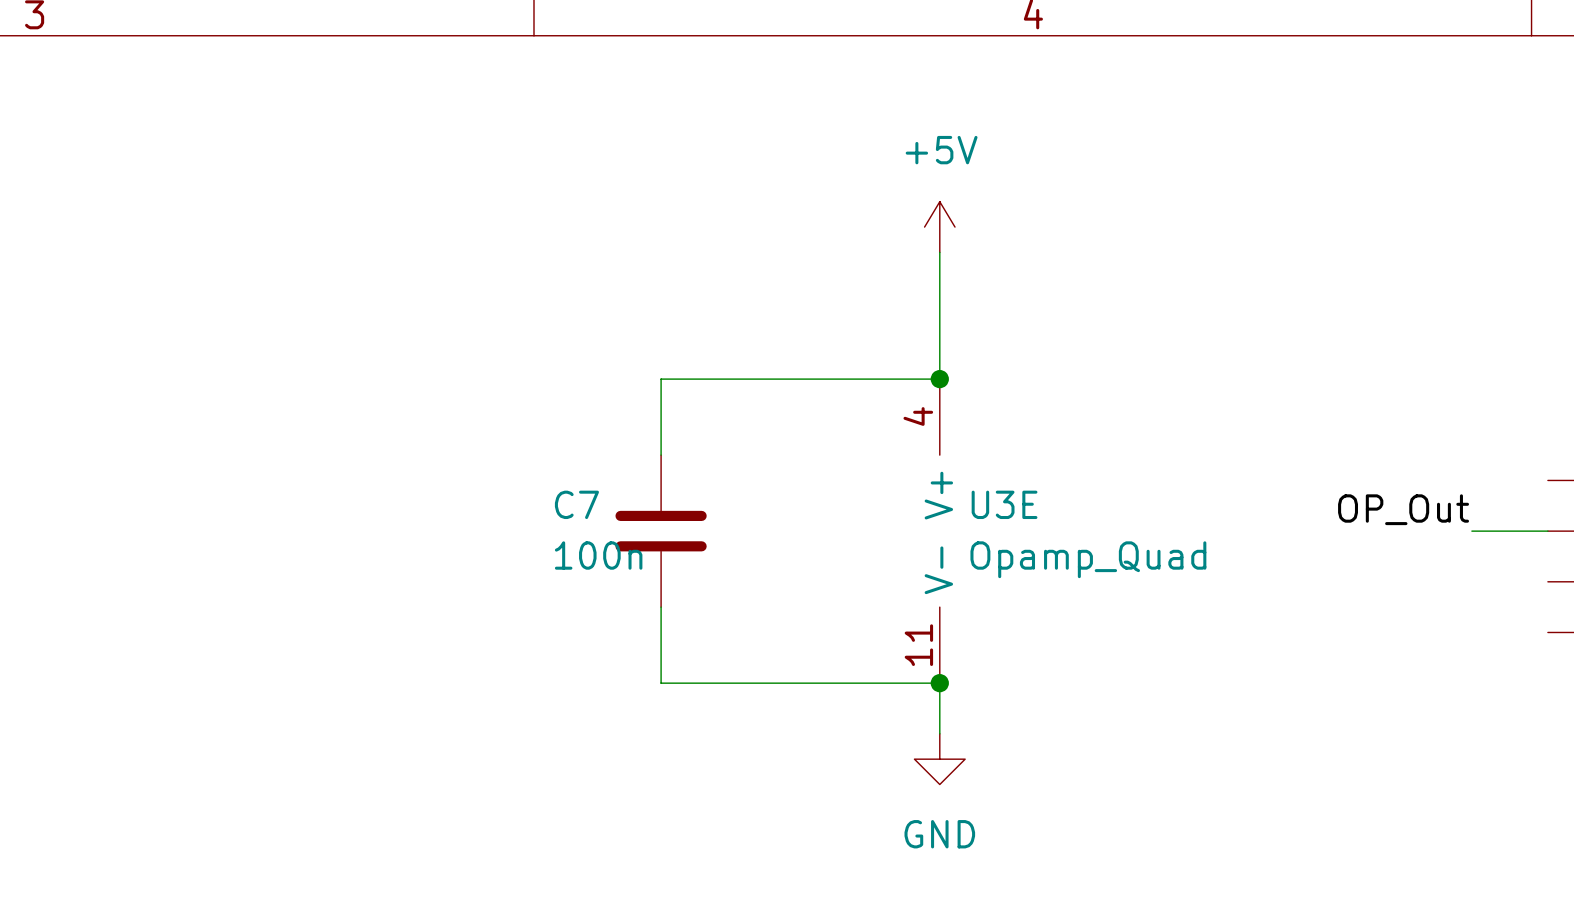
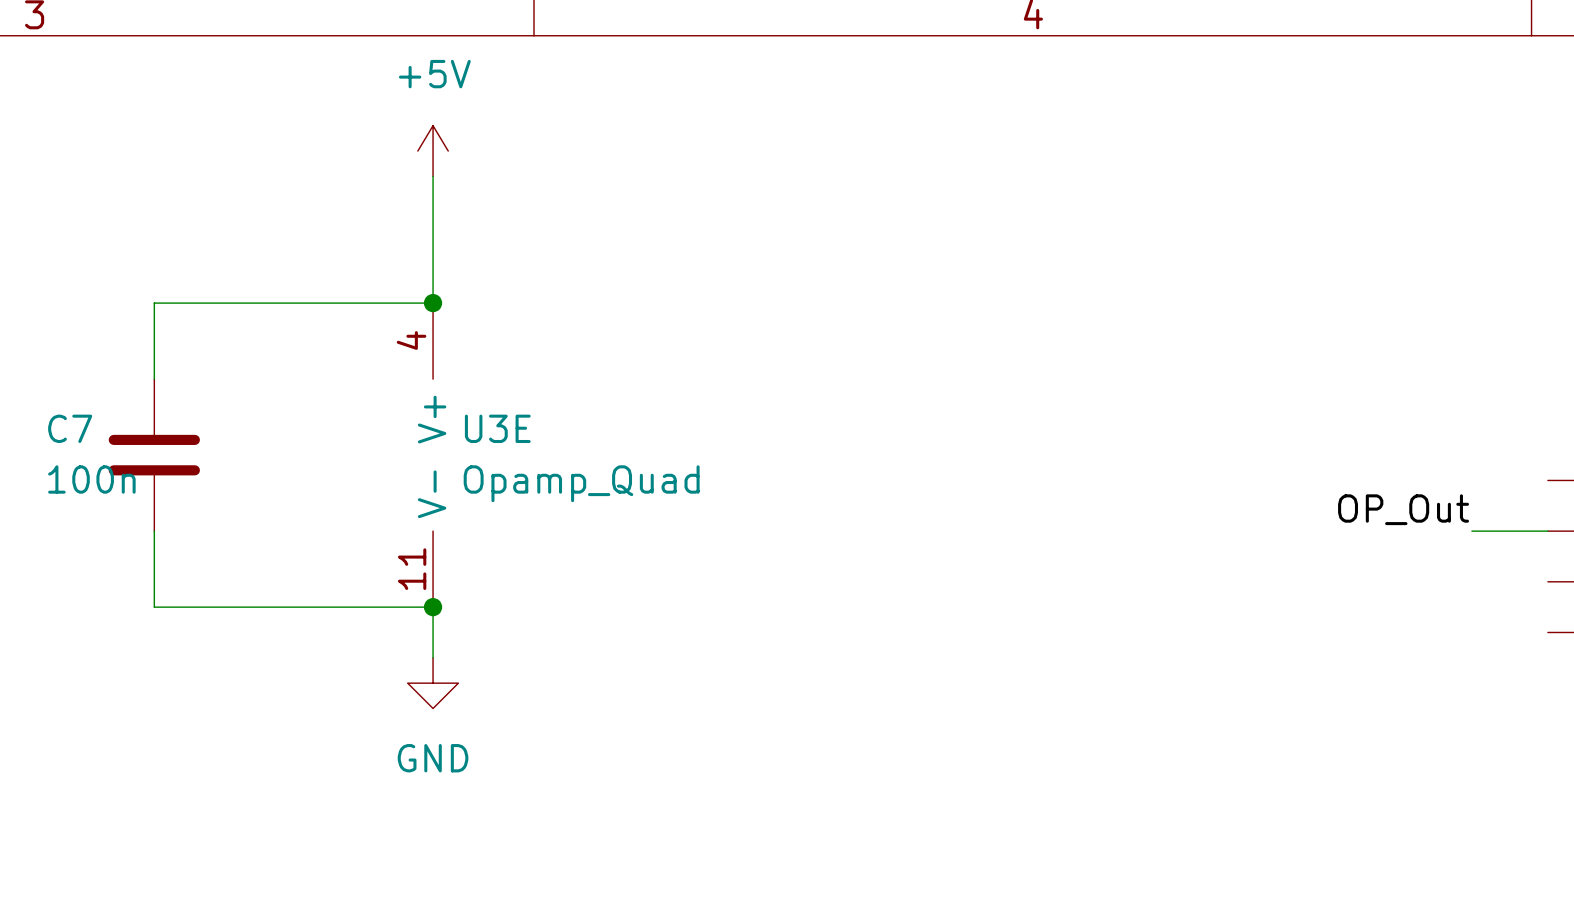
power symbol: none -> +5V (433, 151)
wire: none -> (433, 176) (433, 303) (154, 303) (154, 379)
power symbol: +5V (939, 227) -> none
wire: (939, 252) (939, 379) (661, 379) (661, 455) -> none
junction: none -> (433, 303)
junction: (939, 379) -> none
wire: none -> (154, 531) (154, 607) (433, 607) (433, 657)
C7 position: (661, 531) -> (154, 455)
U3E position: (939, 531) -> (433, 455)
junction: none -> (433, 607)
wire: (661, 607) (661, 683) (939, 683) (939, 733) -> none
power symbol: none -> GND (433, 683)
junction: (939, 683) -> none
power symbol: GND (939, 759) -> none

